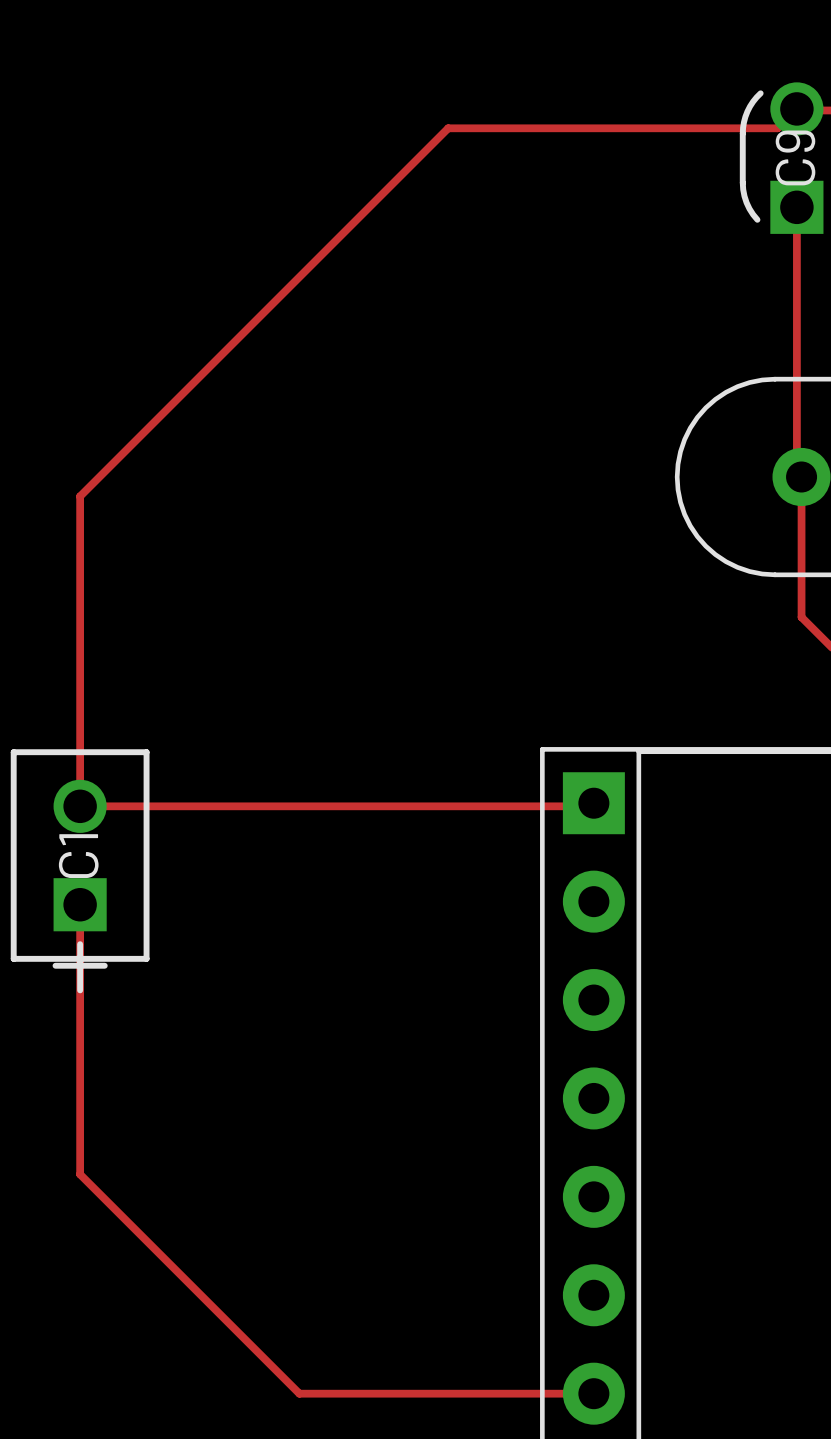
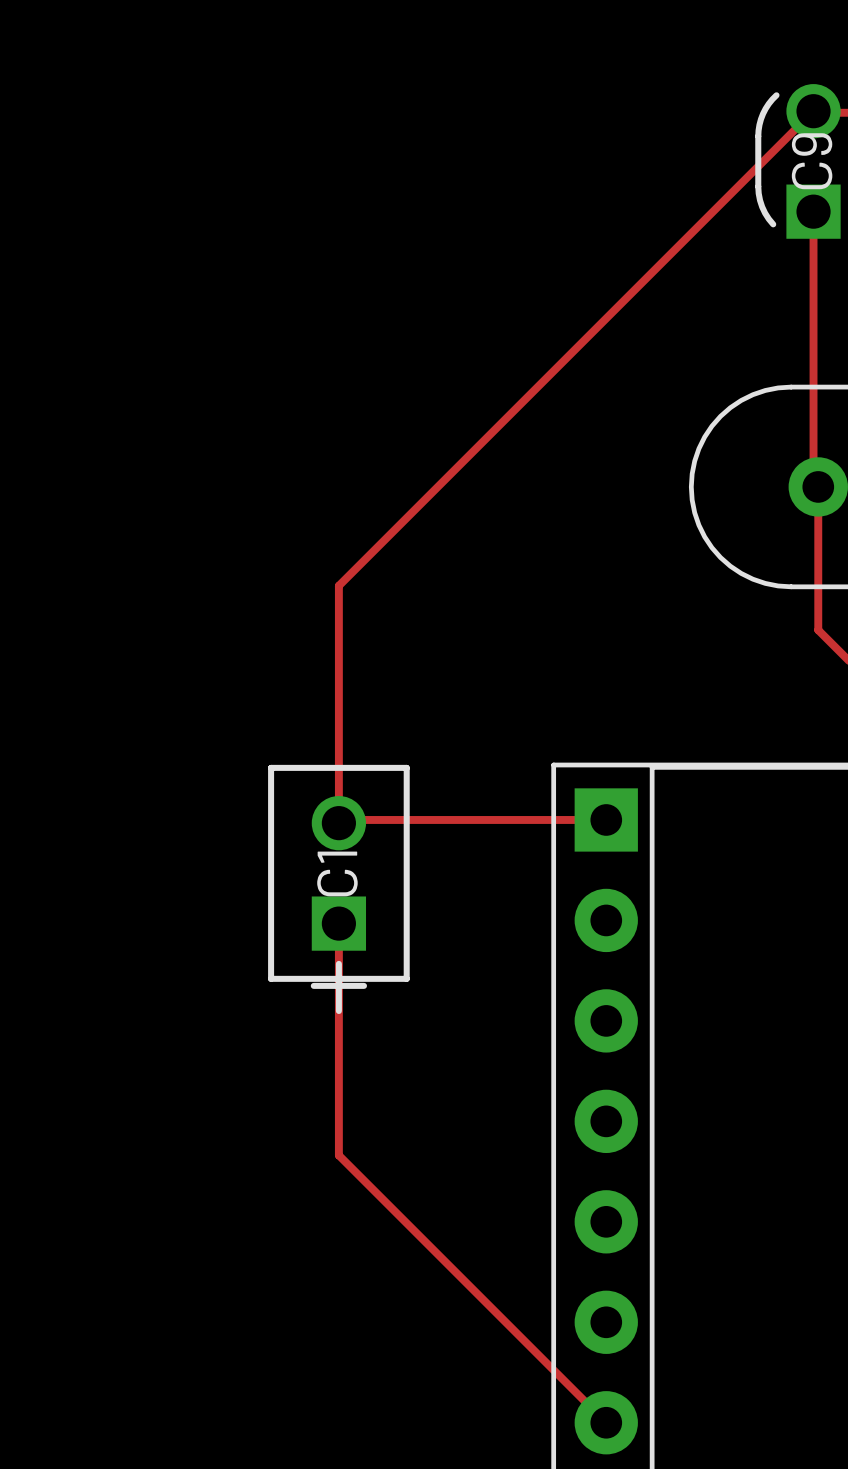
track: (777, 128) (448, 128) (80, 496) (80, 806) (590, 806) -> (793, 130) (338, 585) (338, 823) (342, 819) (606, 819)
C1 position: (80, 871) -> (338, 889)
track: (80, 904) (80, 1174) (299, 1393) (593, 1393) -> (338, 923) (338, 1155) (606, 1422)

